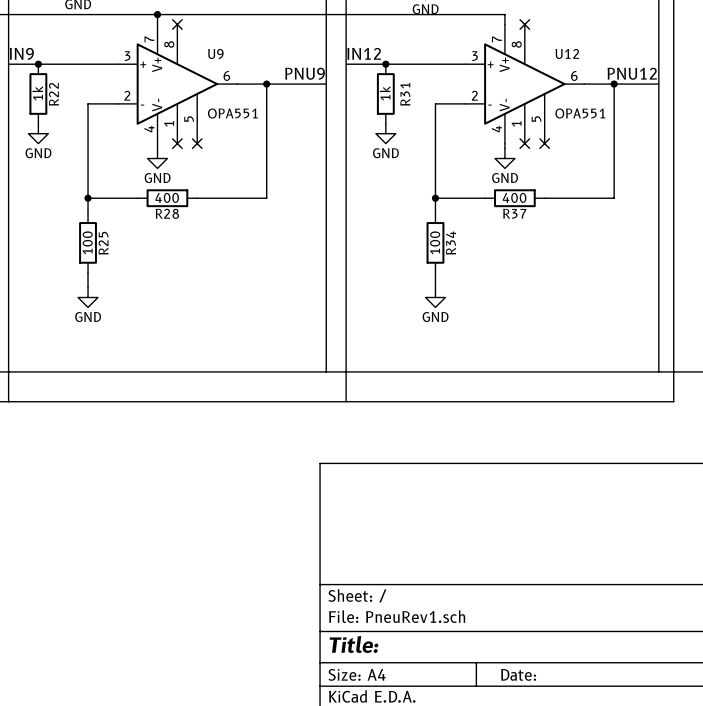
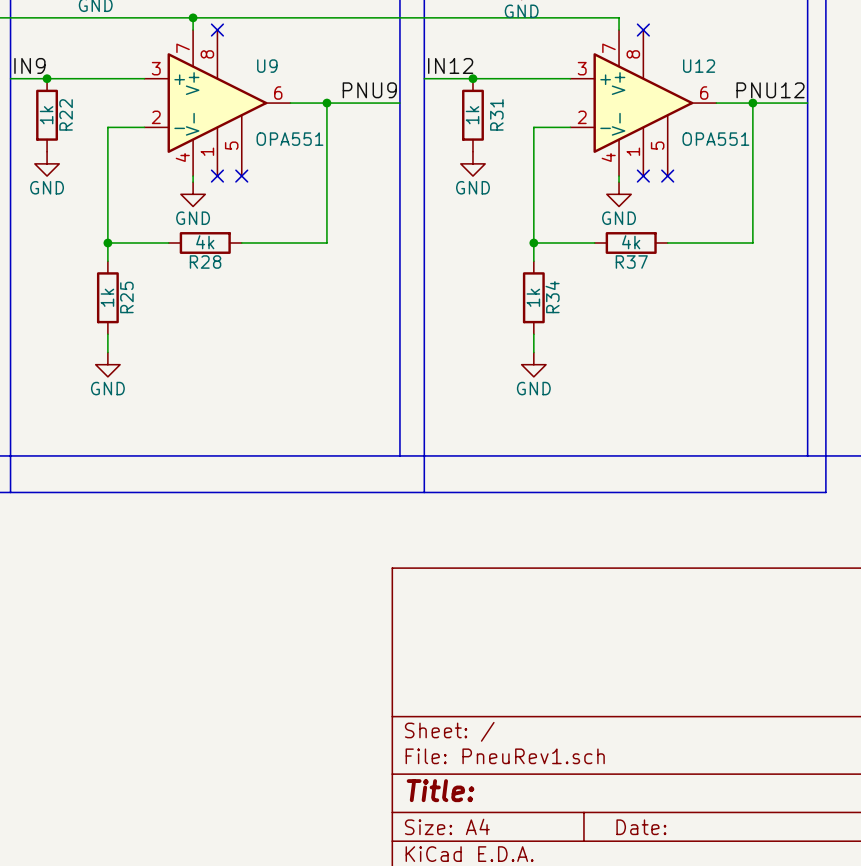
R28 value: 400 (167, 197) -> 4k (205, 242)
R37 value: 400 (514, 197) -> 4k (631, 242)
R25 value: 100 (87, 242) -> 1k (107, 297)
R34 value: 100 (435, 242) -> 1k (533, 297)

